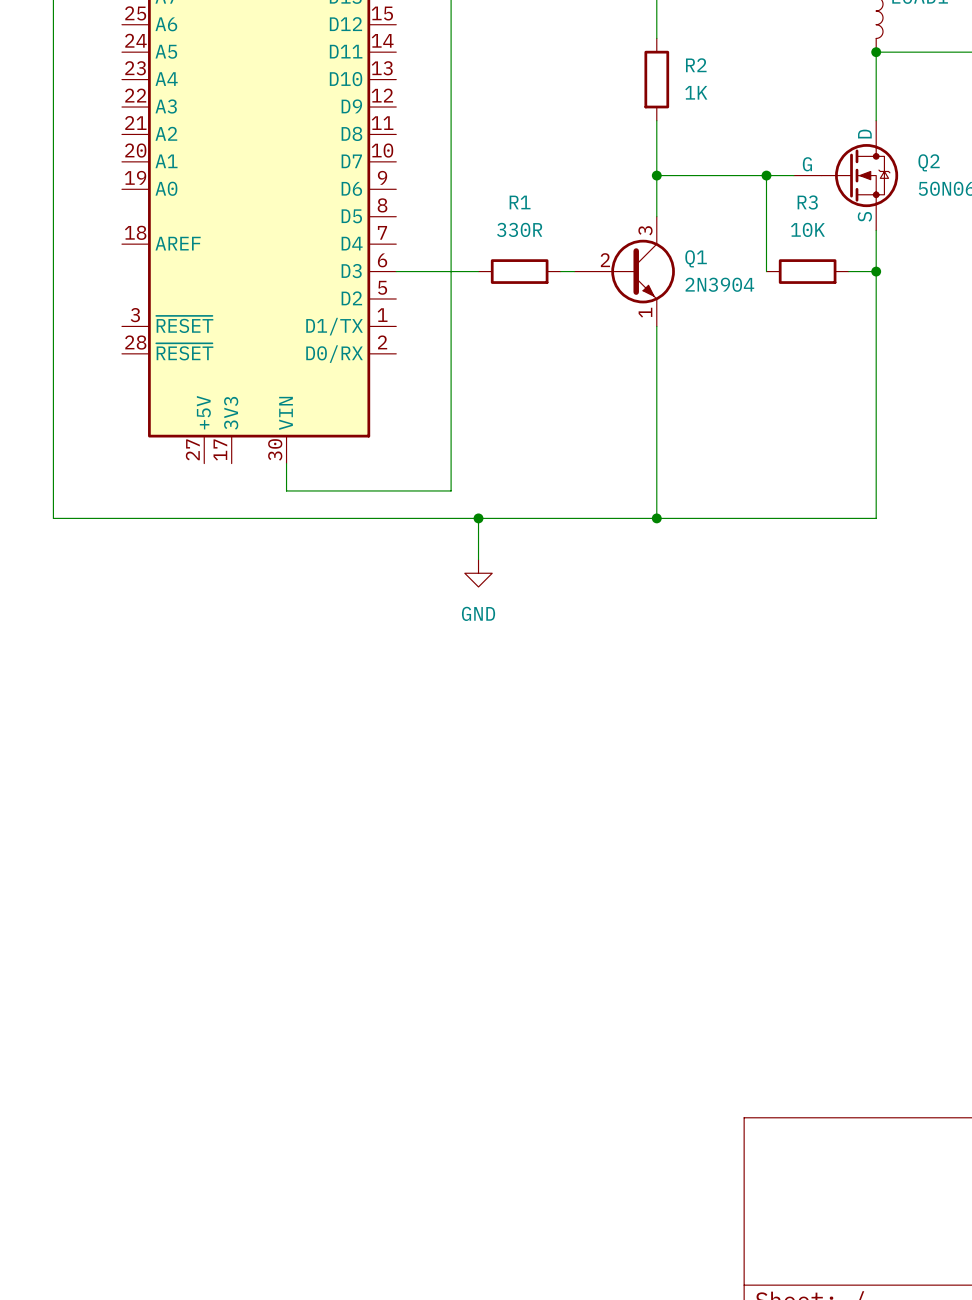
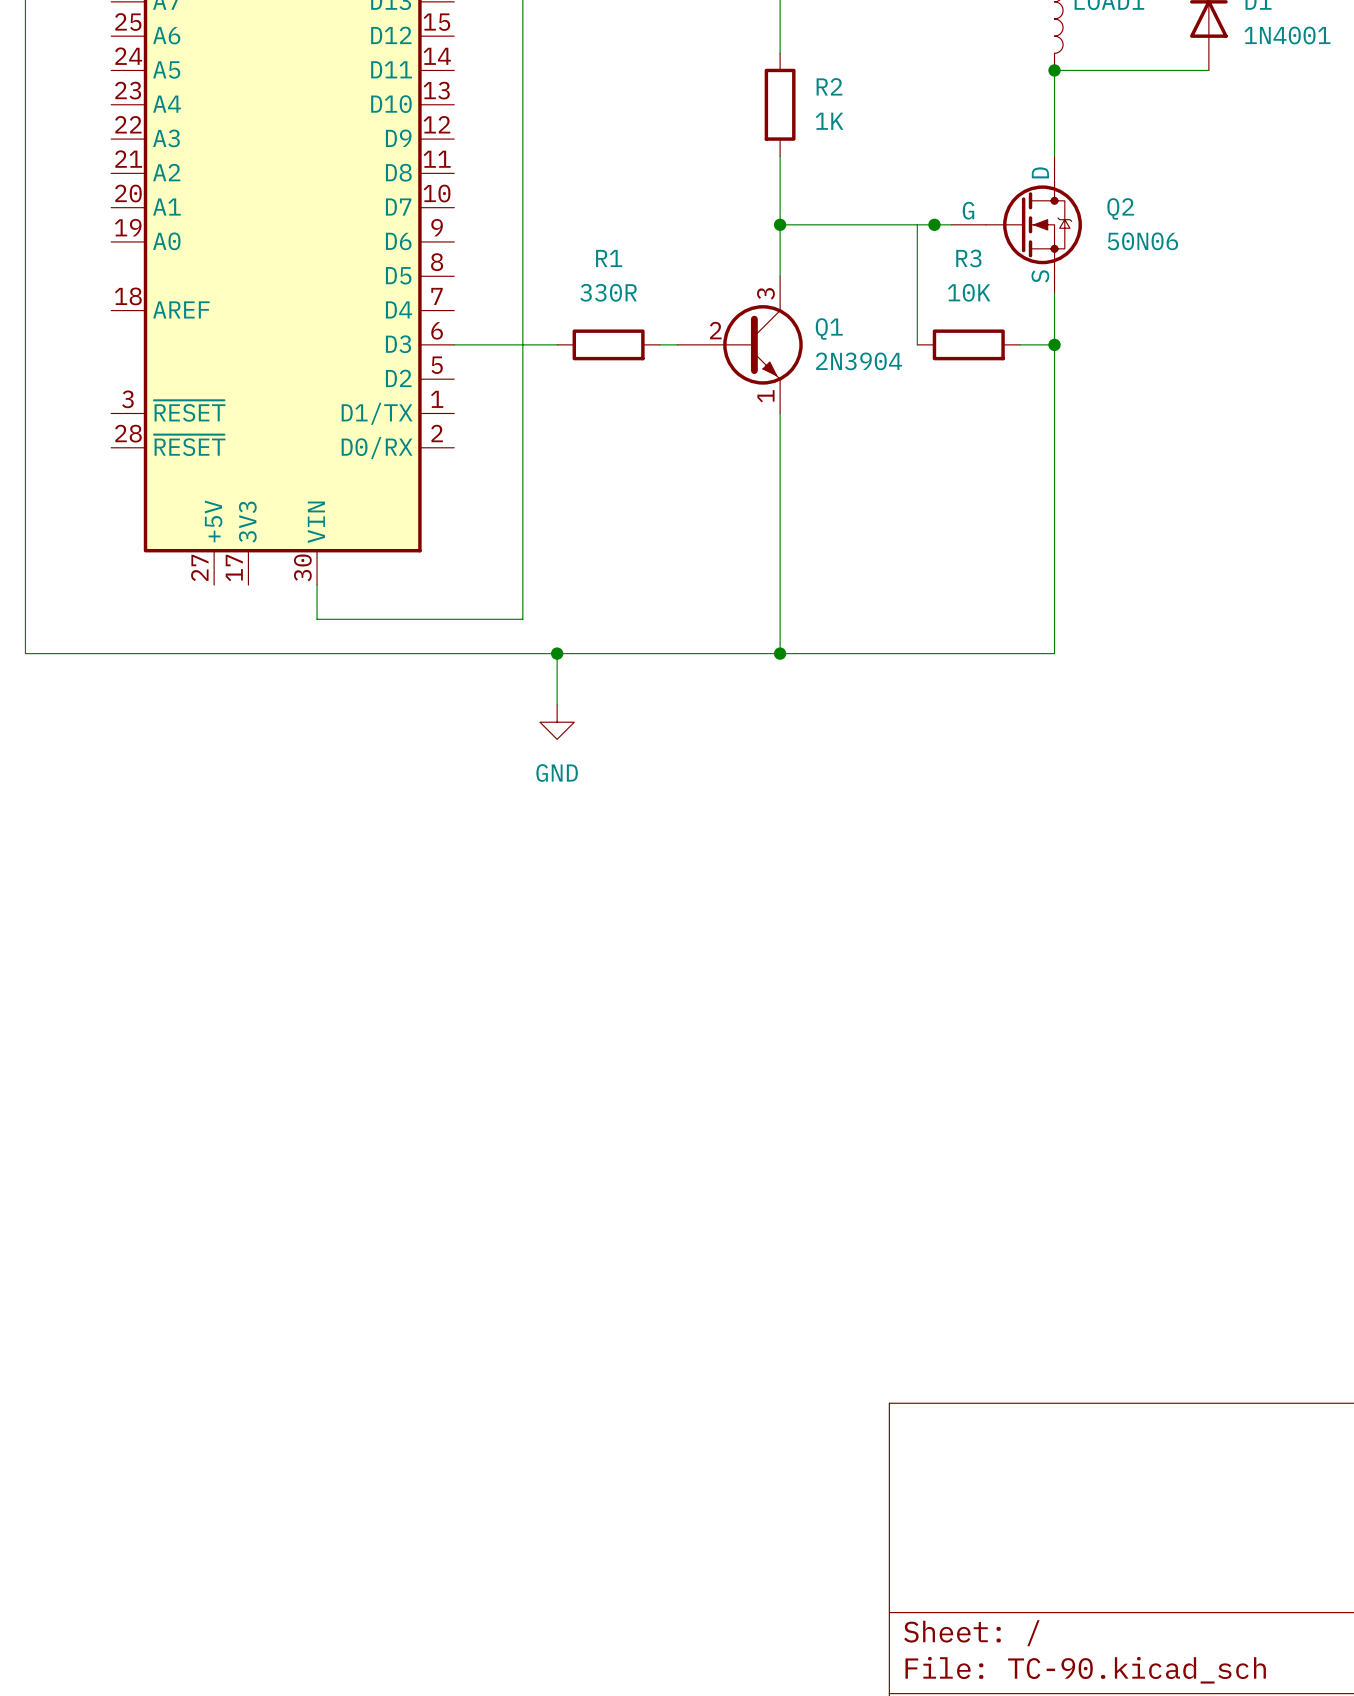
junction position: (766, 175) -> (934, 224)

